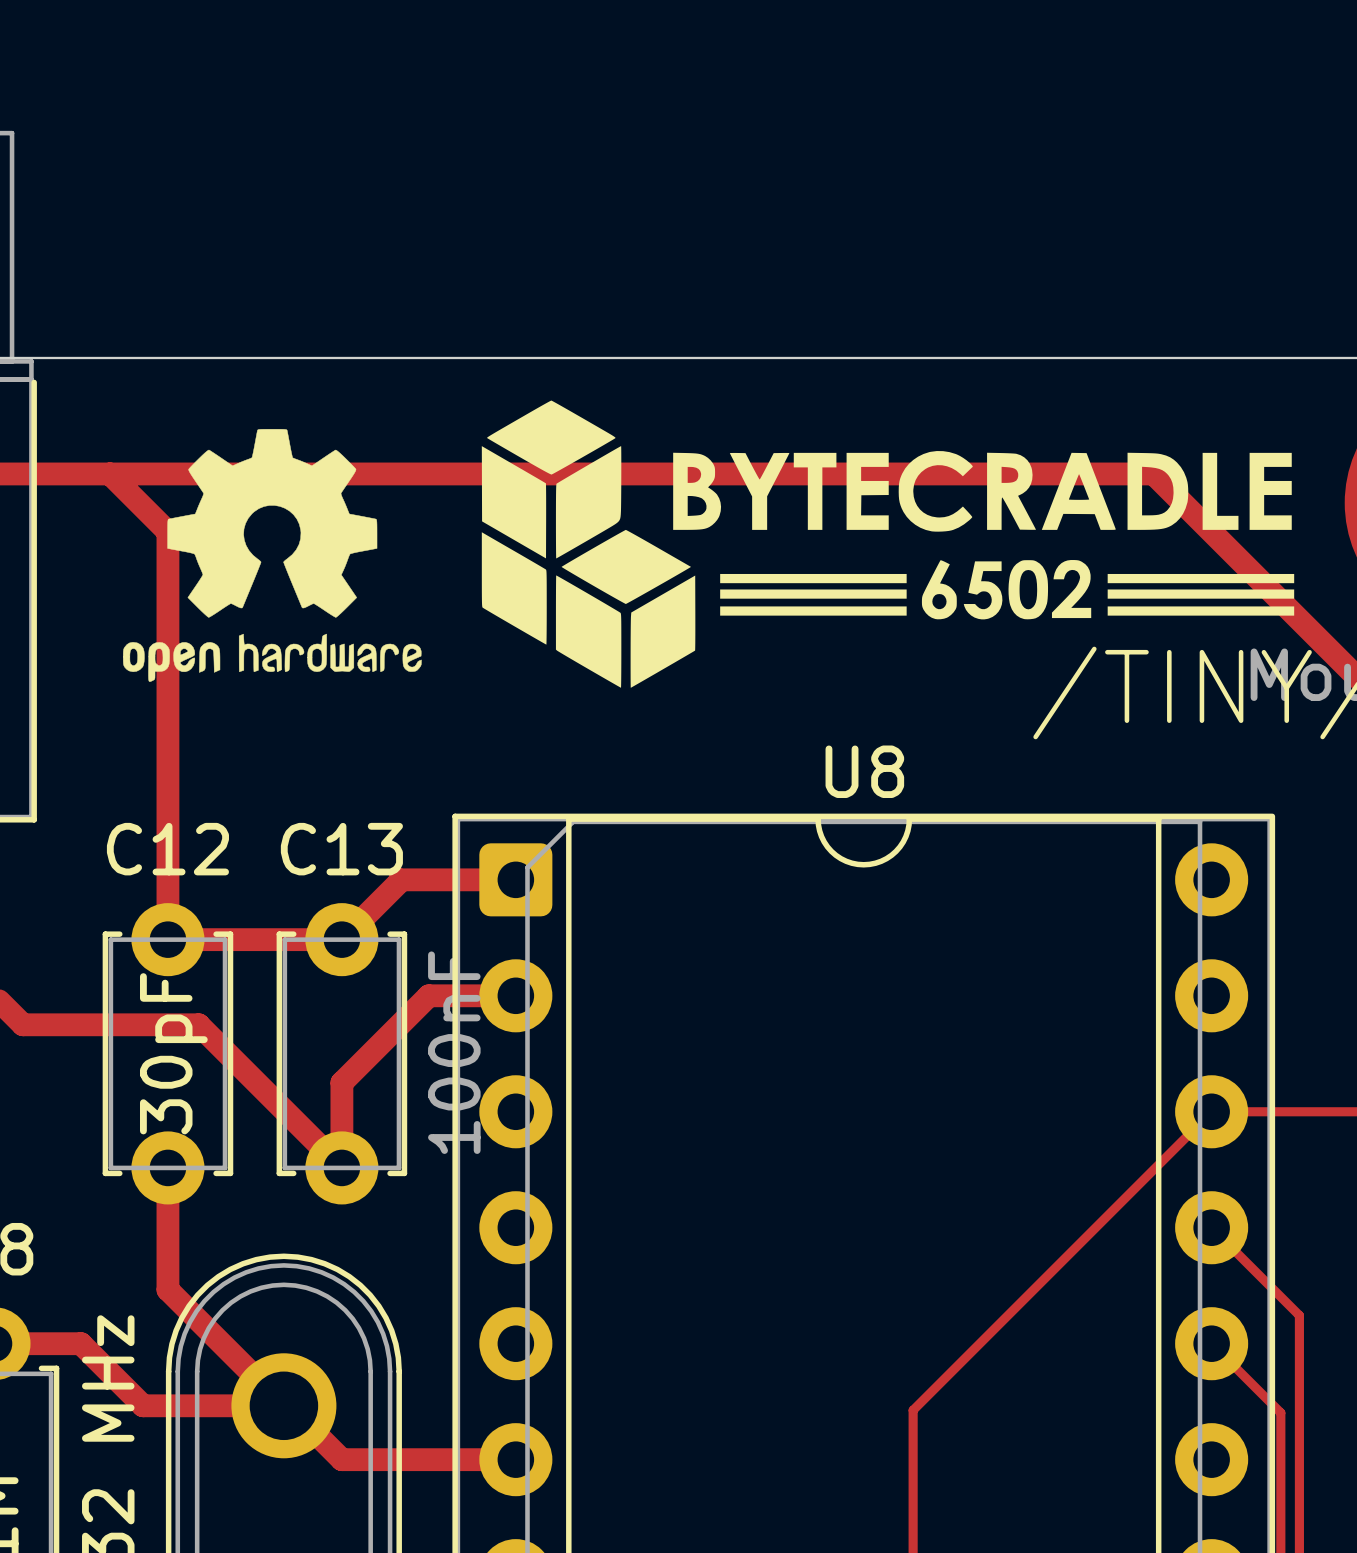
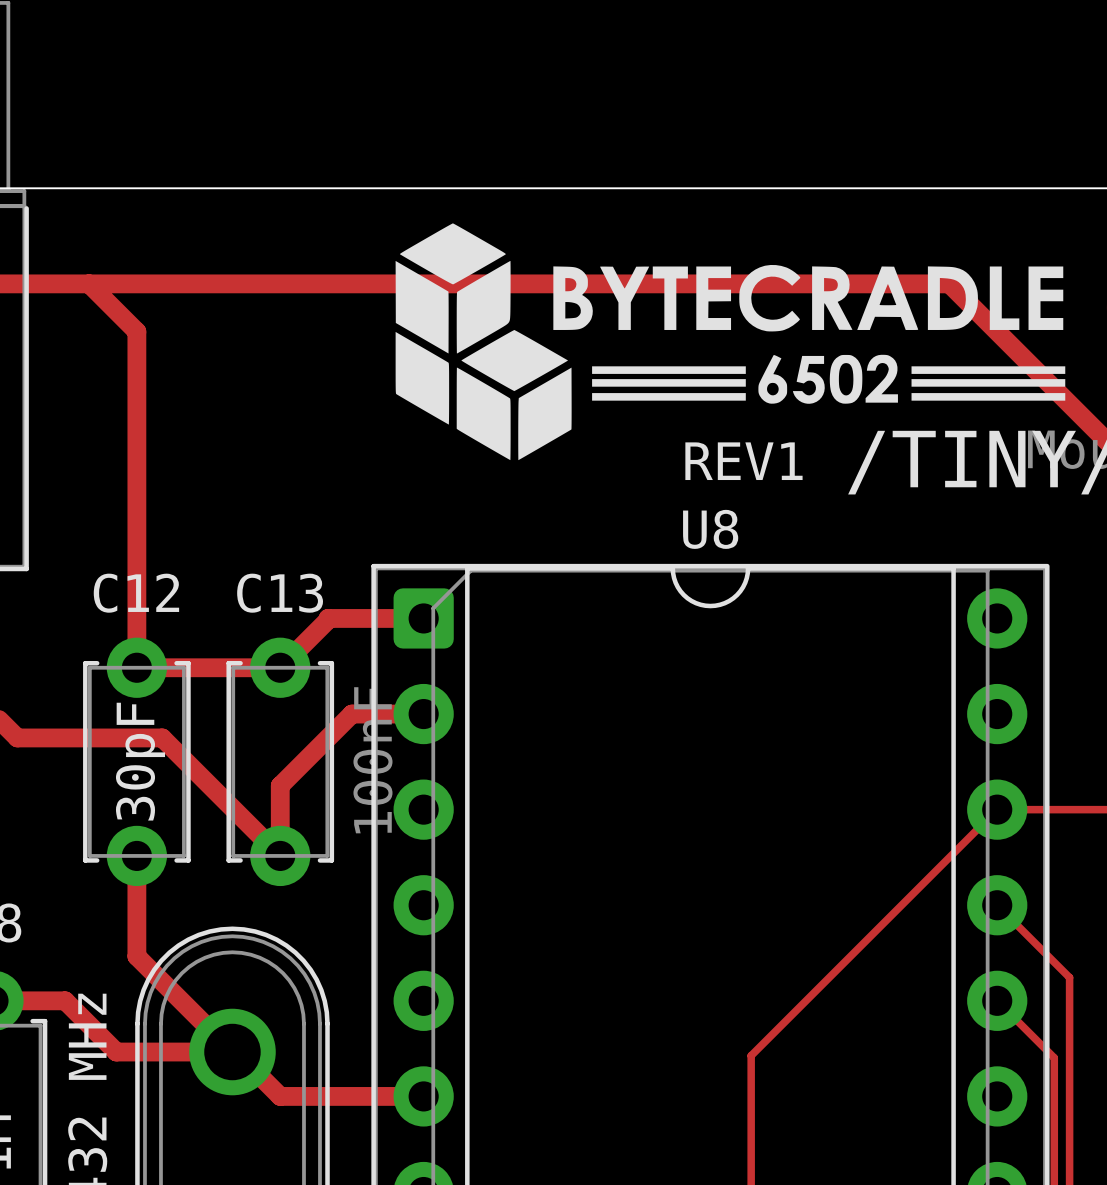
drawing: [122, 429, 422, 682] -> none
text: none -> REV1 (743, 461)

